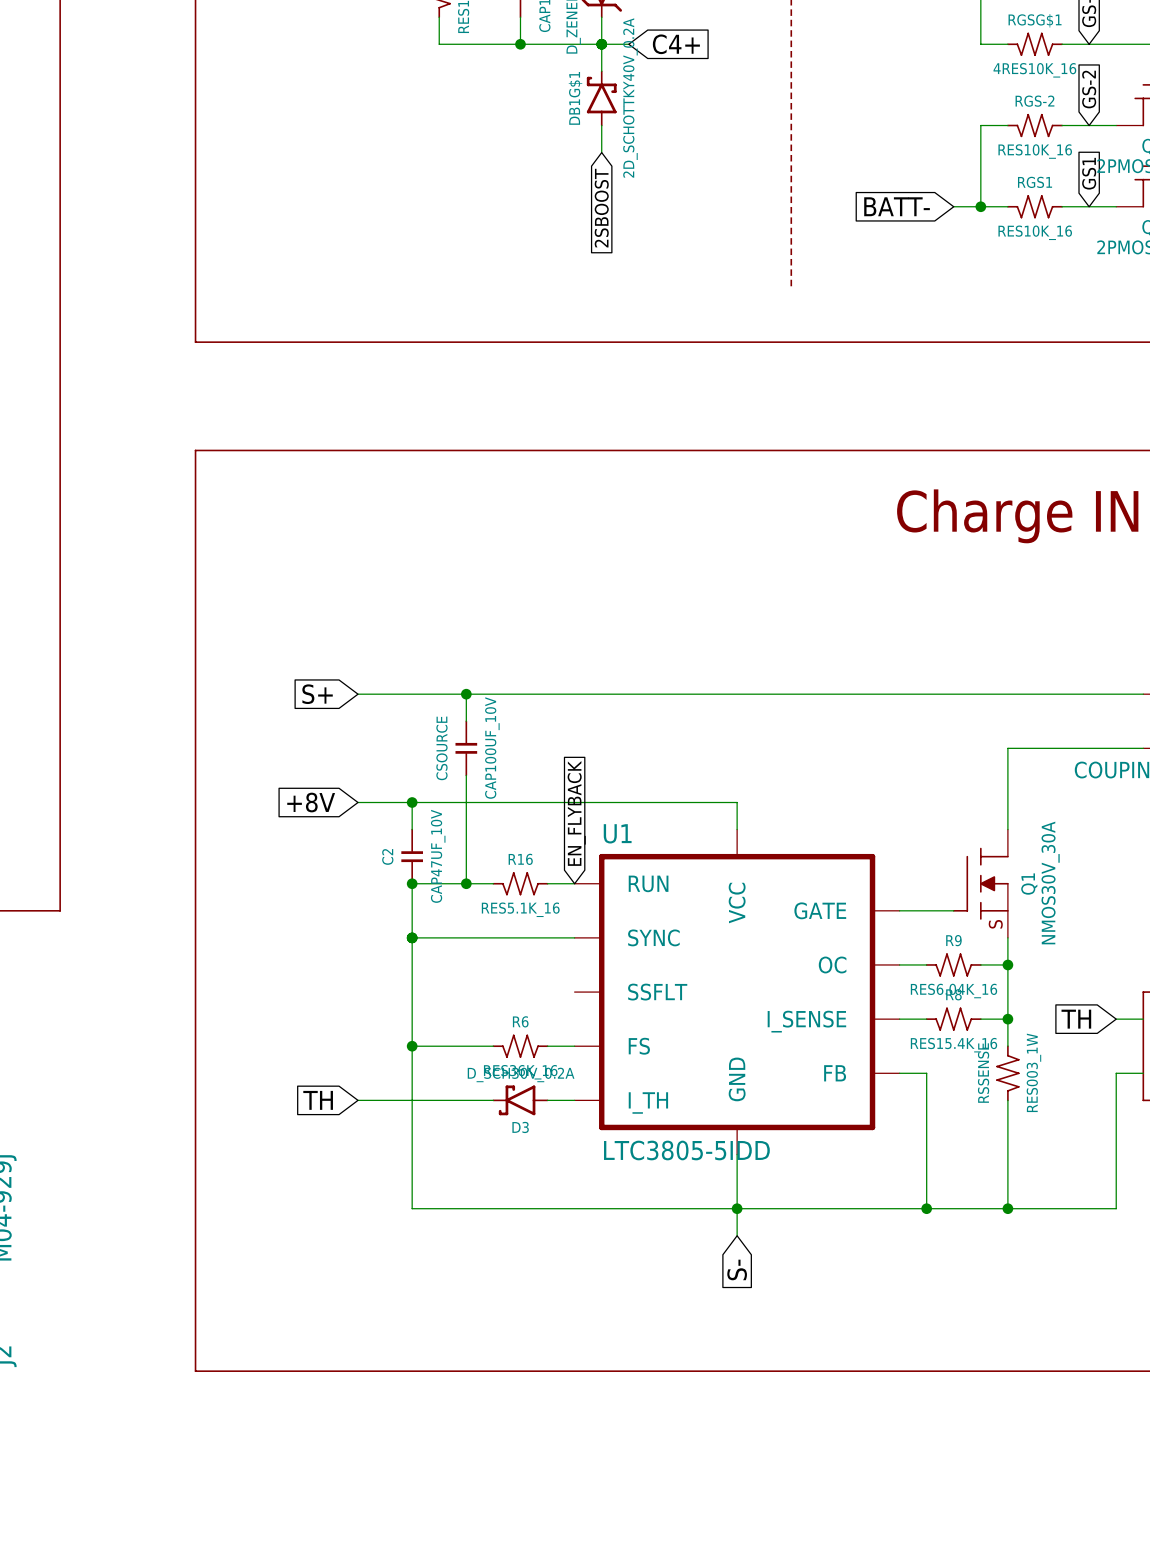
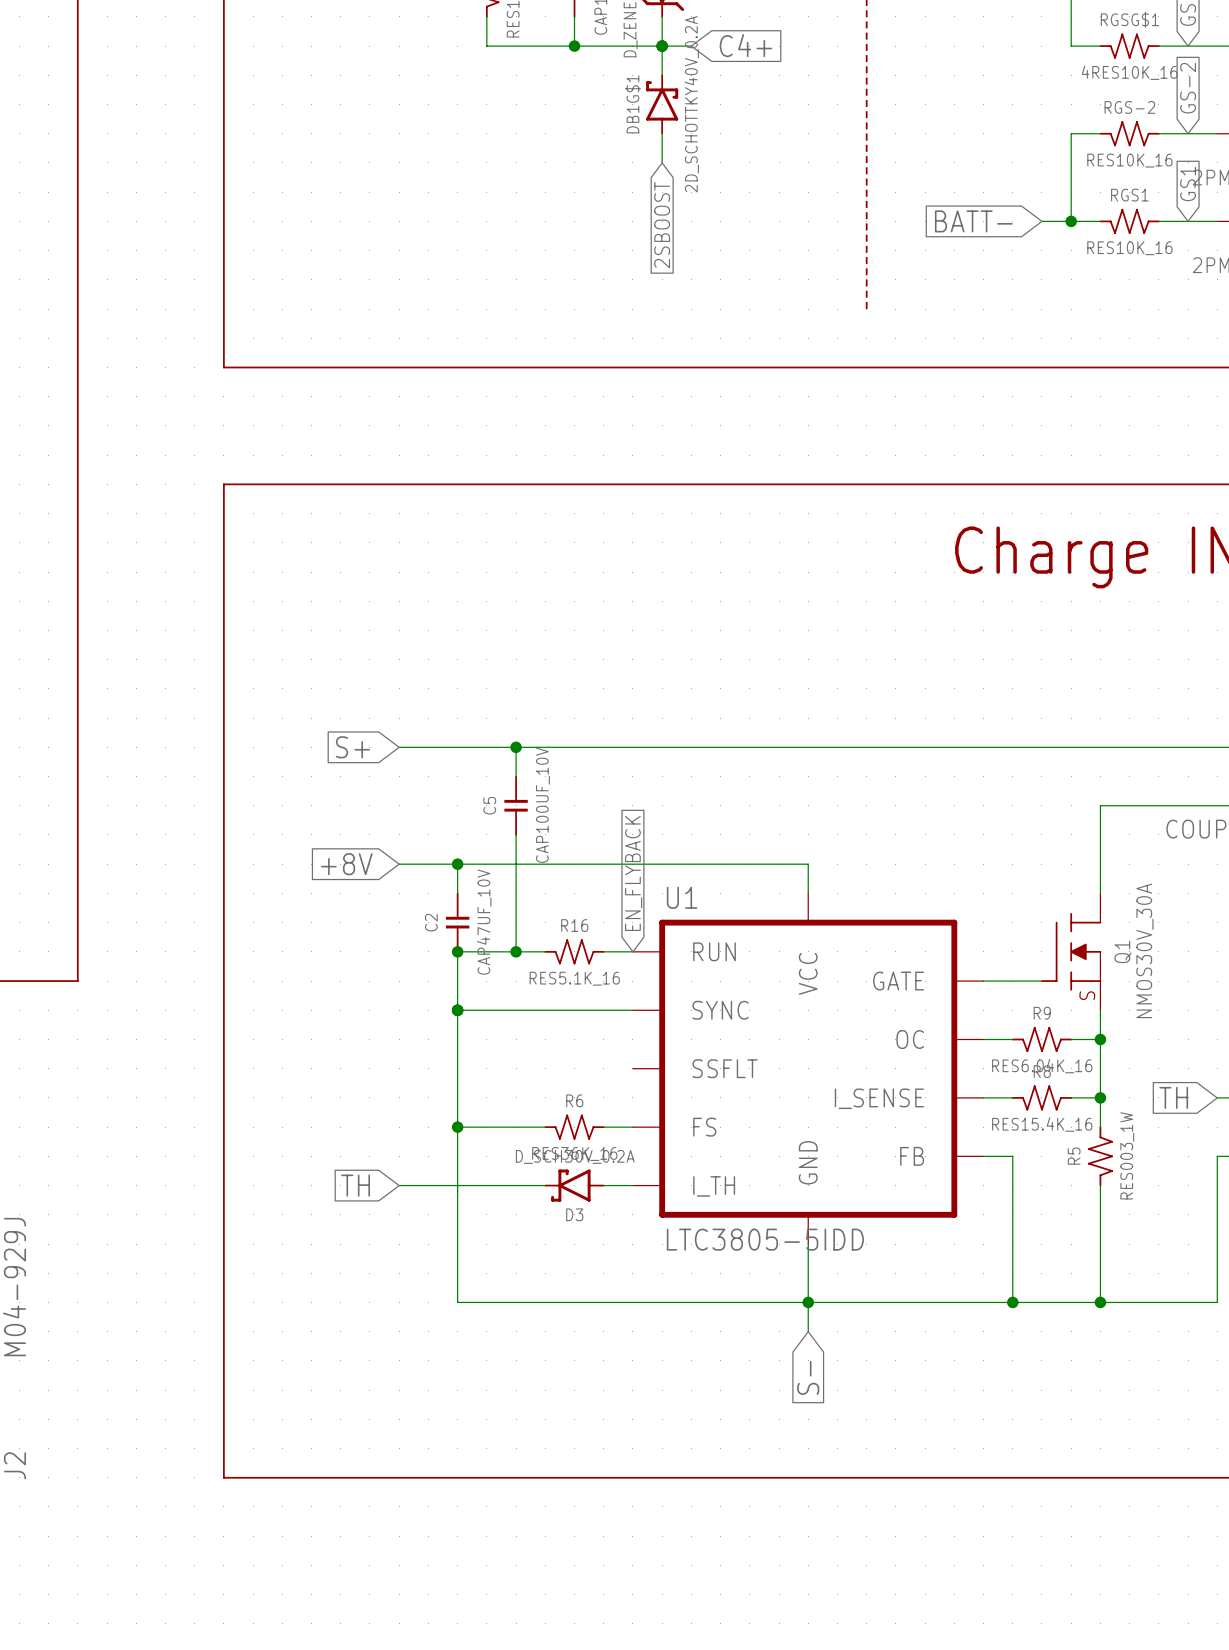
CSOURCE name: CSOURCE (441, 748) -> C5 (489, 805)
RSSENSE name: RSSENSE (983, 1073) -> R5 (1074, 1156)

